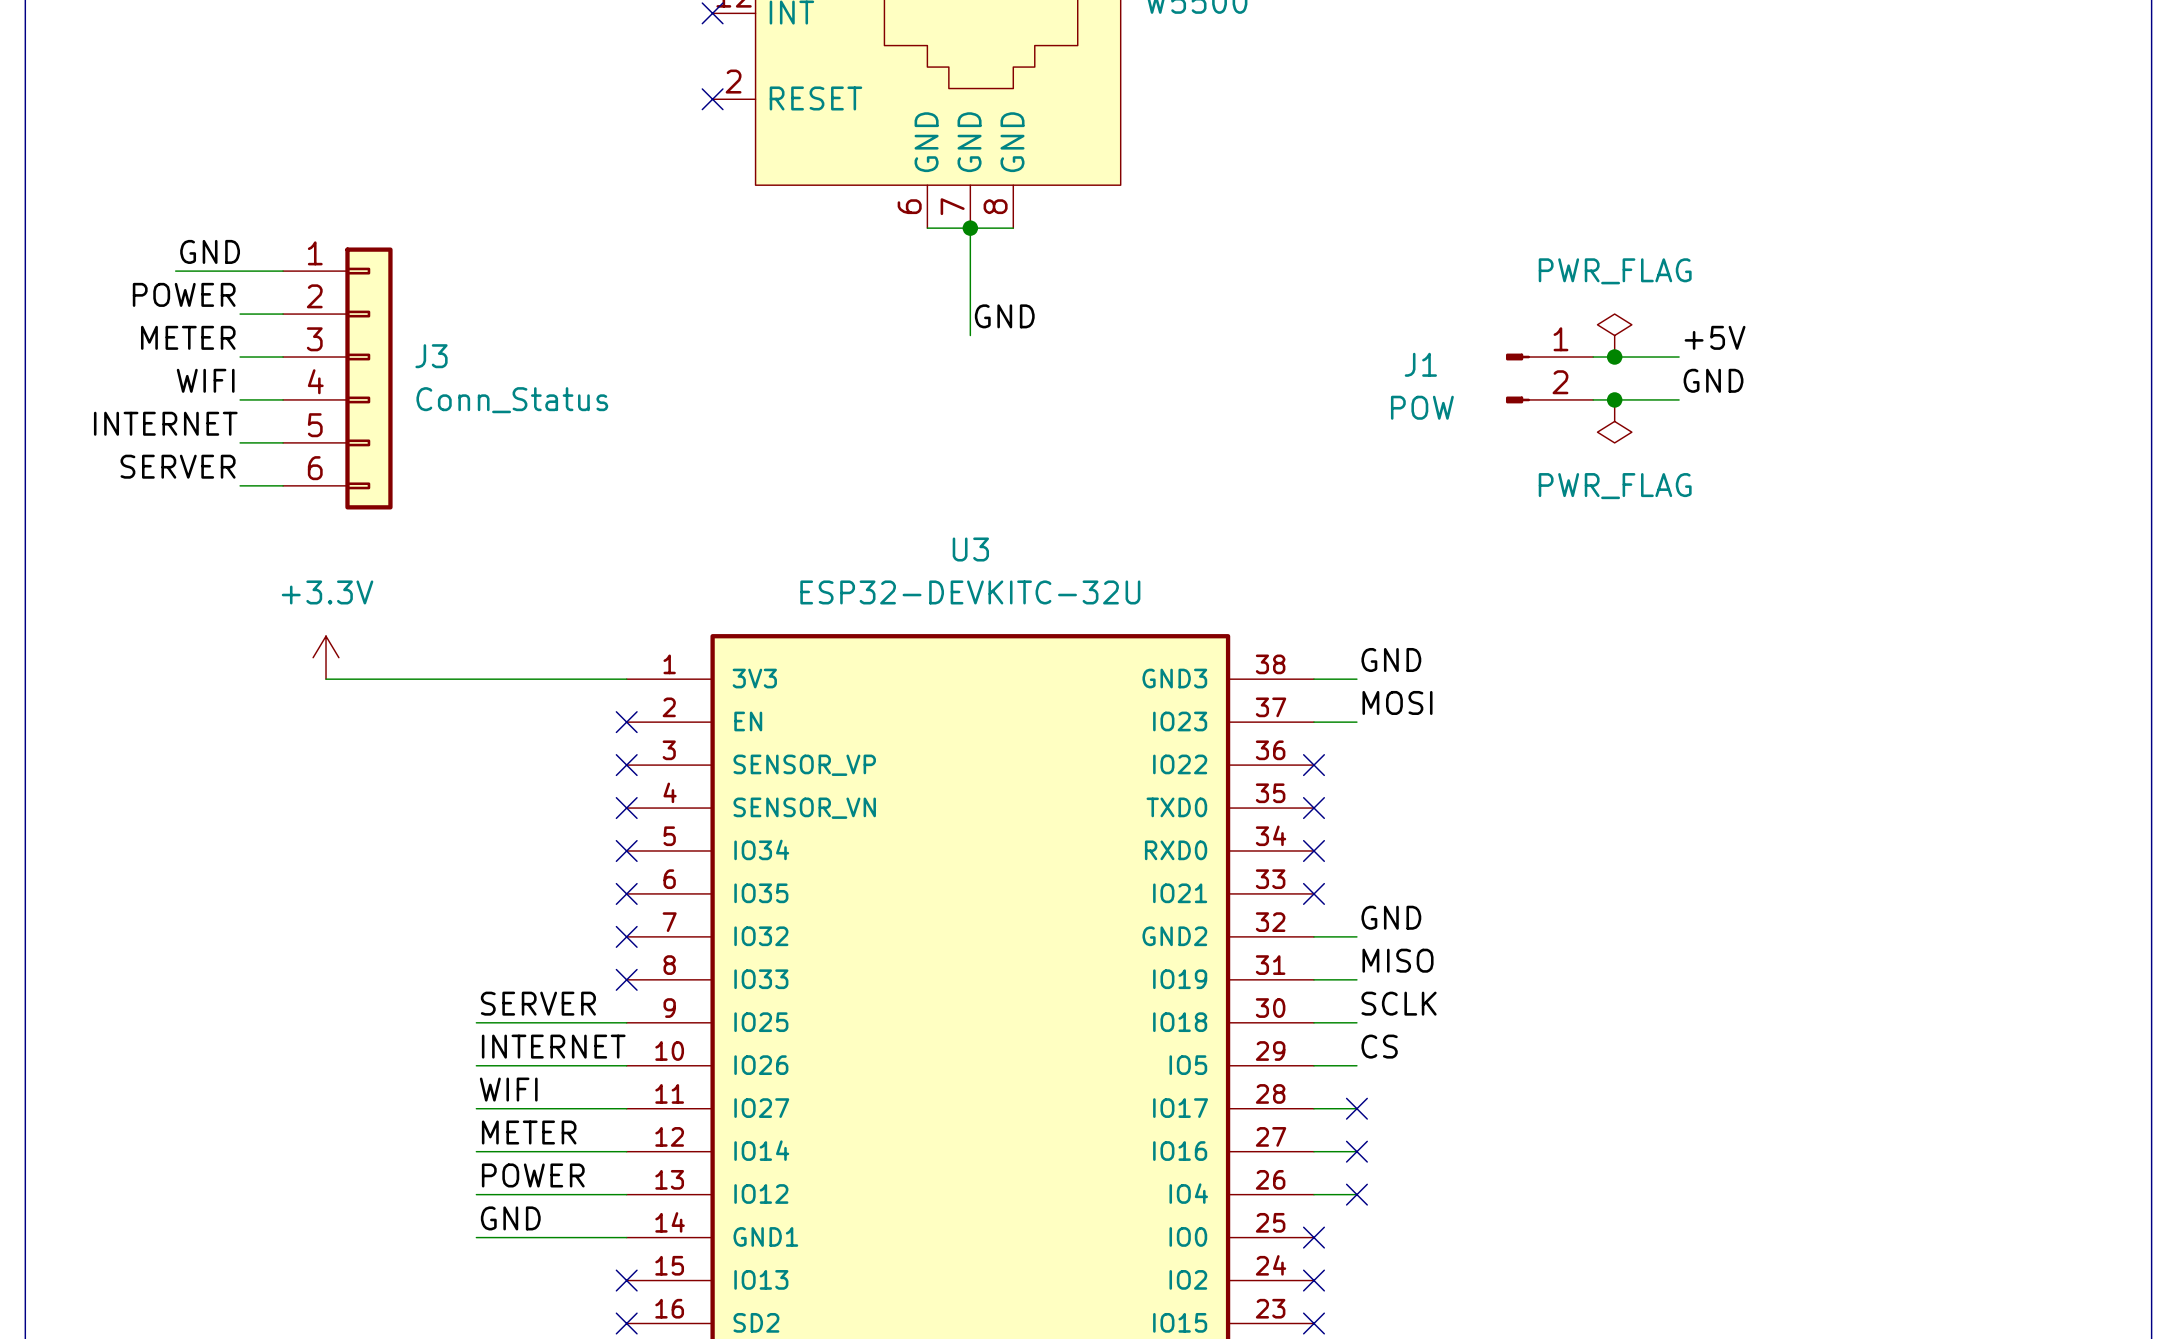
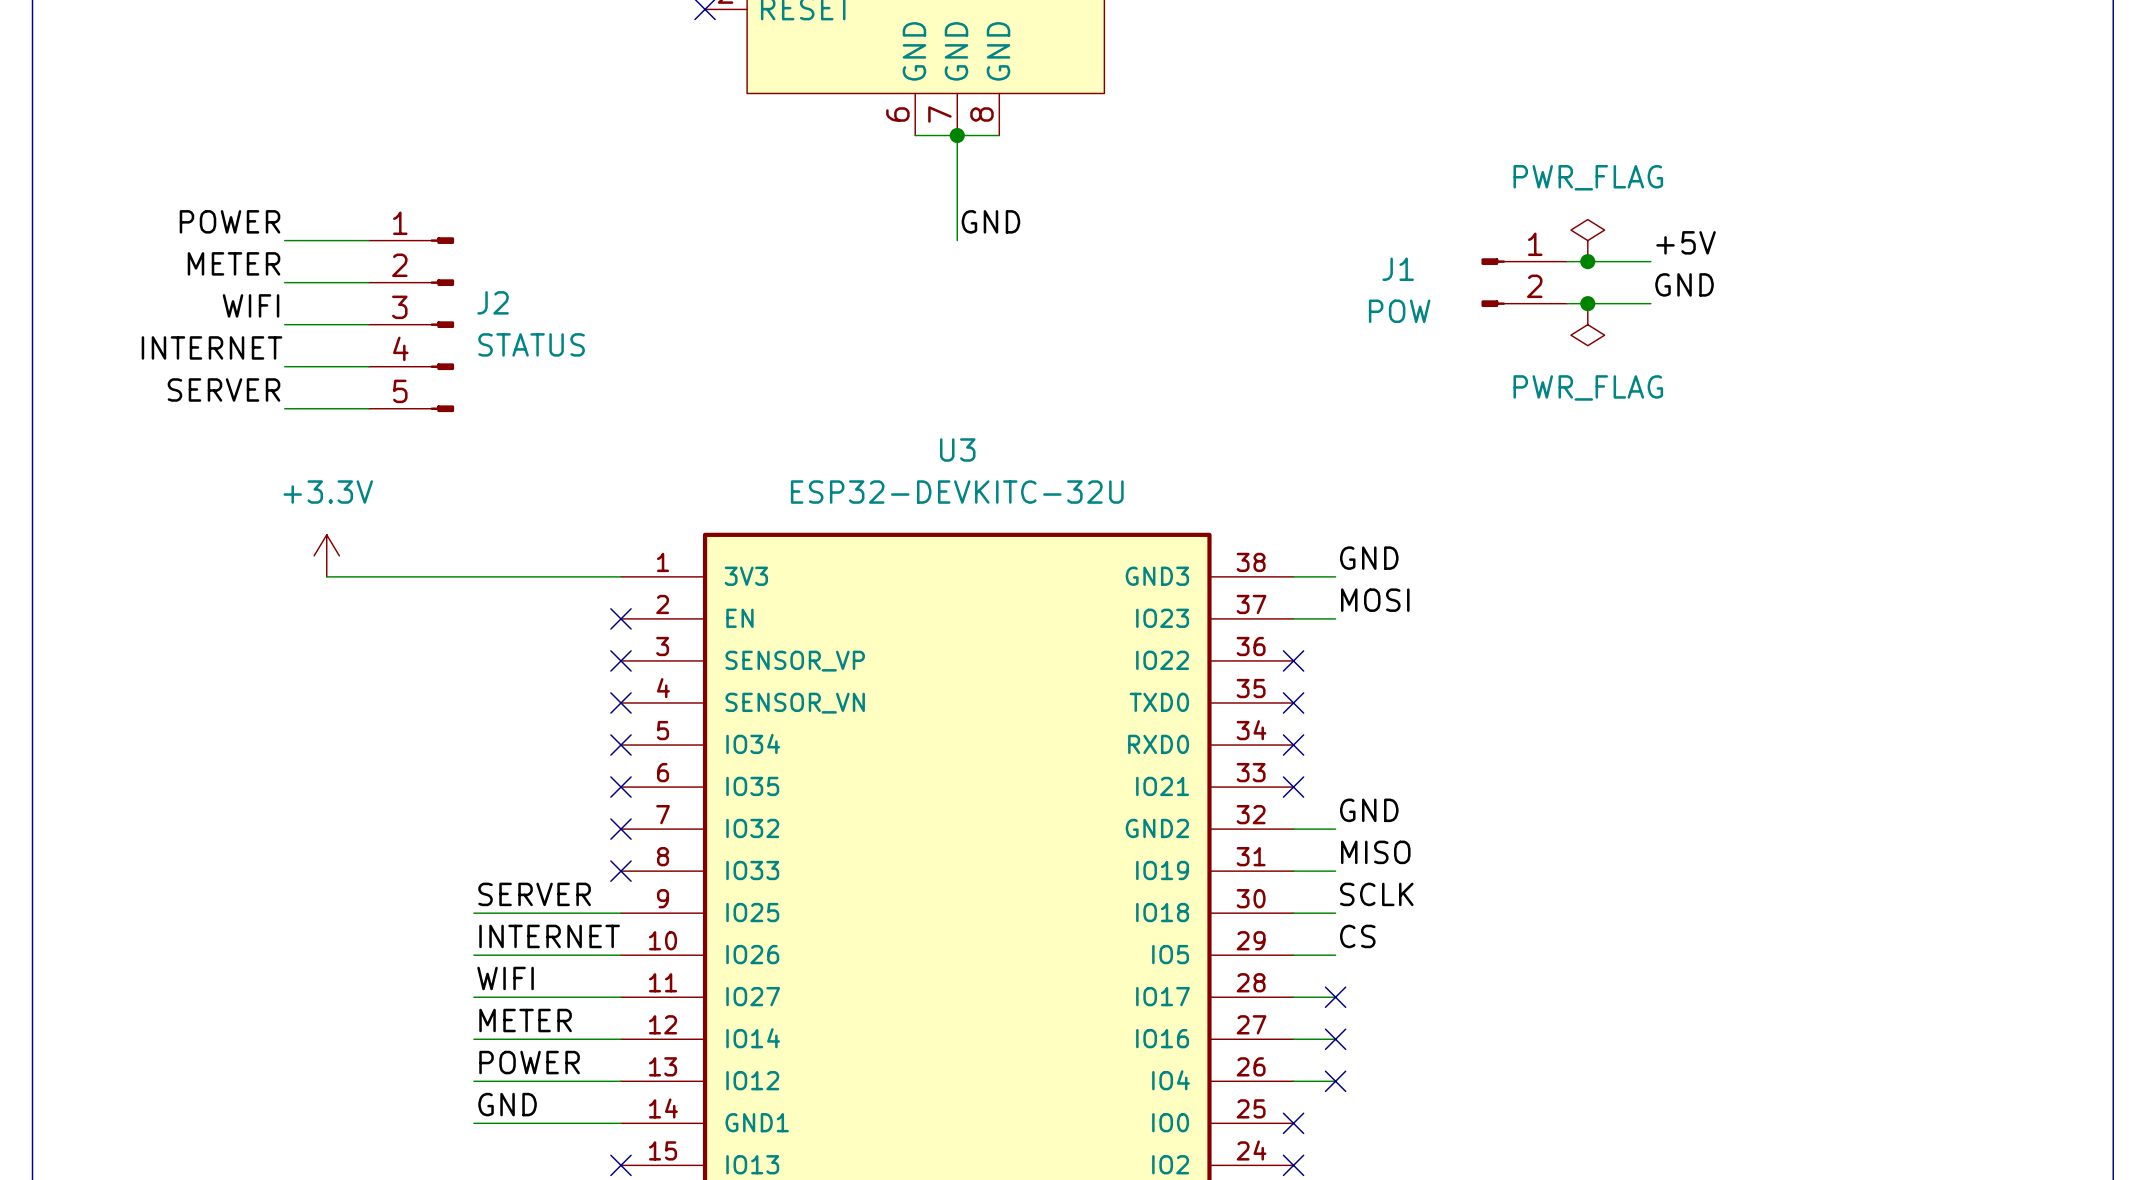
label: GND (210, 251) -> none
wire: (175, 271) (283, 271) -> none
label position: POWER (184, 294) -> POWER (230, 221)
wire: (240, 314) (283, 314) -> none
wire: none -> (284, 240) (368, 240)
label position: METER (188, 337) -> METER (234, 263)
wire: (240, 357) (283, 357) -> none
wire: none -> (284, 282) (368, 282)
J3: Conn_Status (337, 378) -> none
label position: WIFI (205, 380) -> WIFI (251, 305)
wire: (240, 399) (283, 399) -> none
wire: none -> (284, 324) (368, 324)
J2: none -> STATUS (411, 324)
label position: INTERNET (165, 423) -> INTERNET (211, 347)
wire: (240, 442) (283, 442) -> none
wire: none -> (284, 366) (368, 366)
label position: SERVER (178, 466) -> SERVER (224, 389)
wire: (240, 485) (283, 485) -> none
wire: none -> (284, 408) (368, 408)

